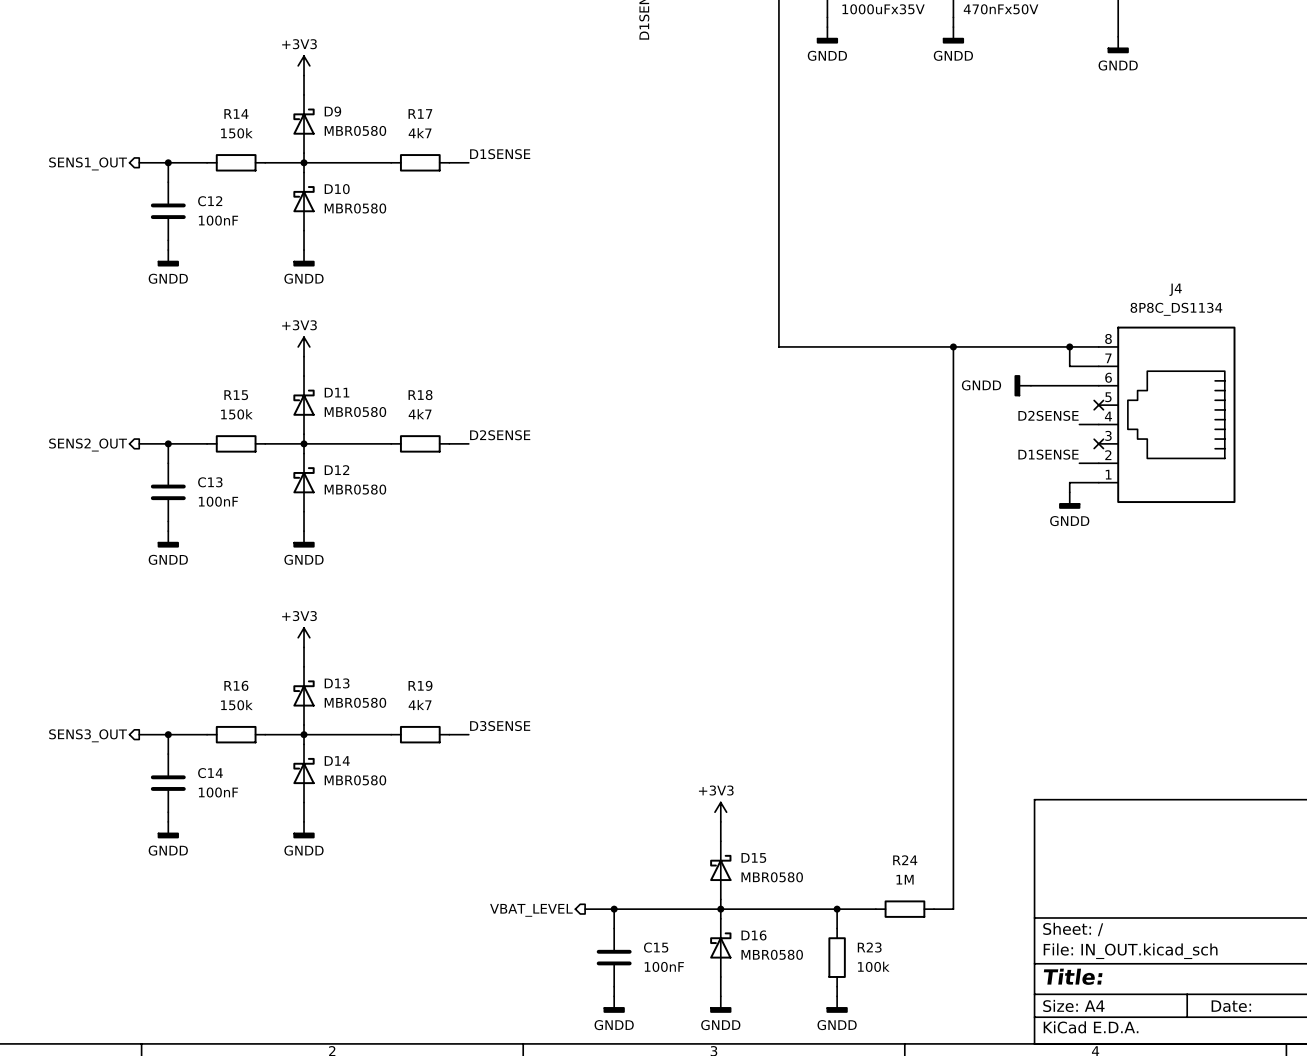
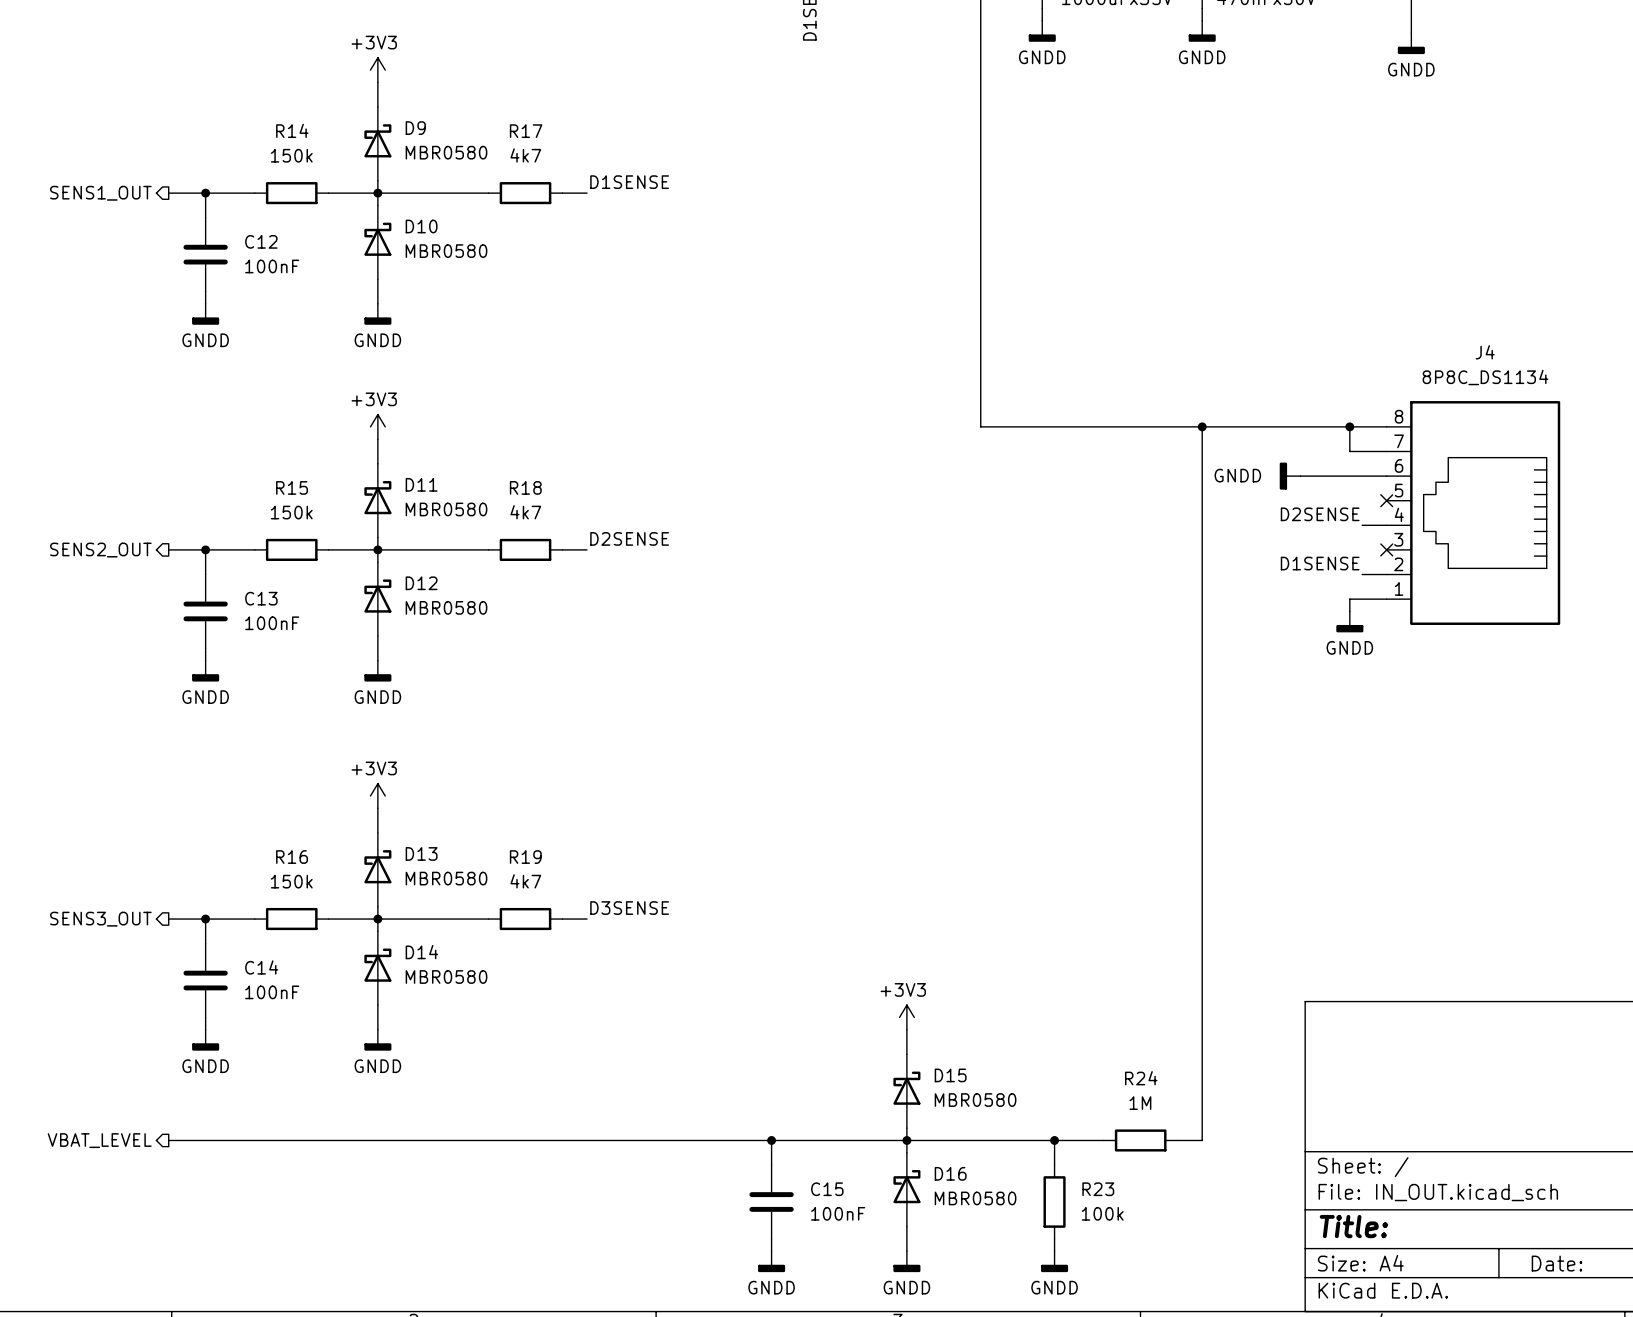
wire: none -> (168, 1140) (734, 1140)
hierarchical label: none -> VBAT_LEVEL (99, 1140)
hierarchical label: VBAT_LEVEL (531, 910) -> none

